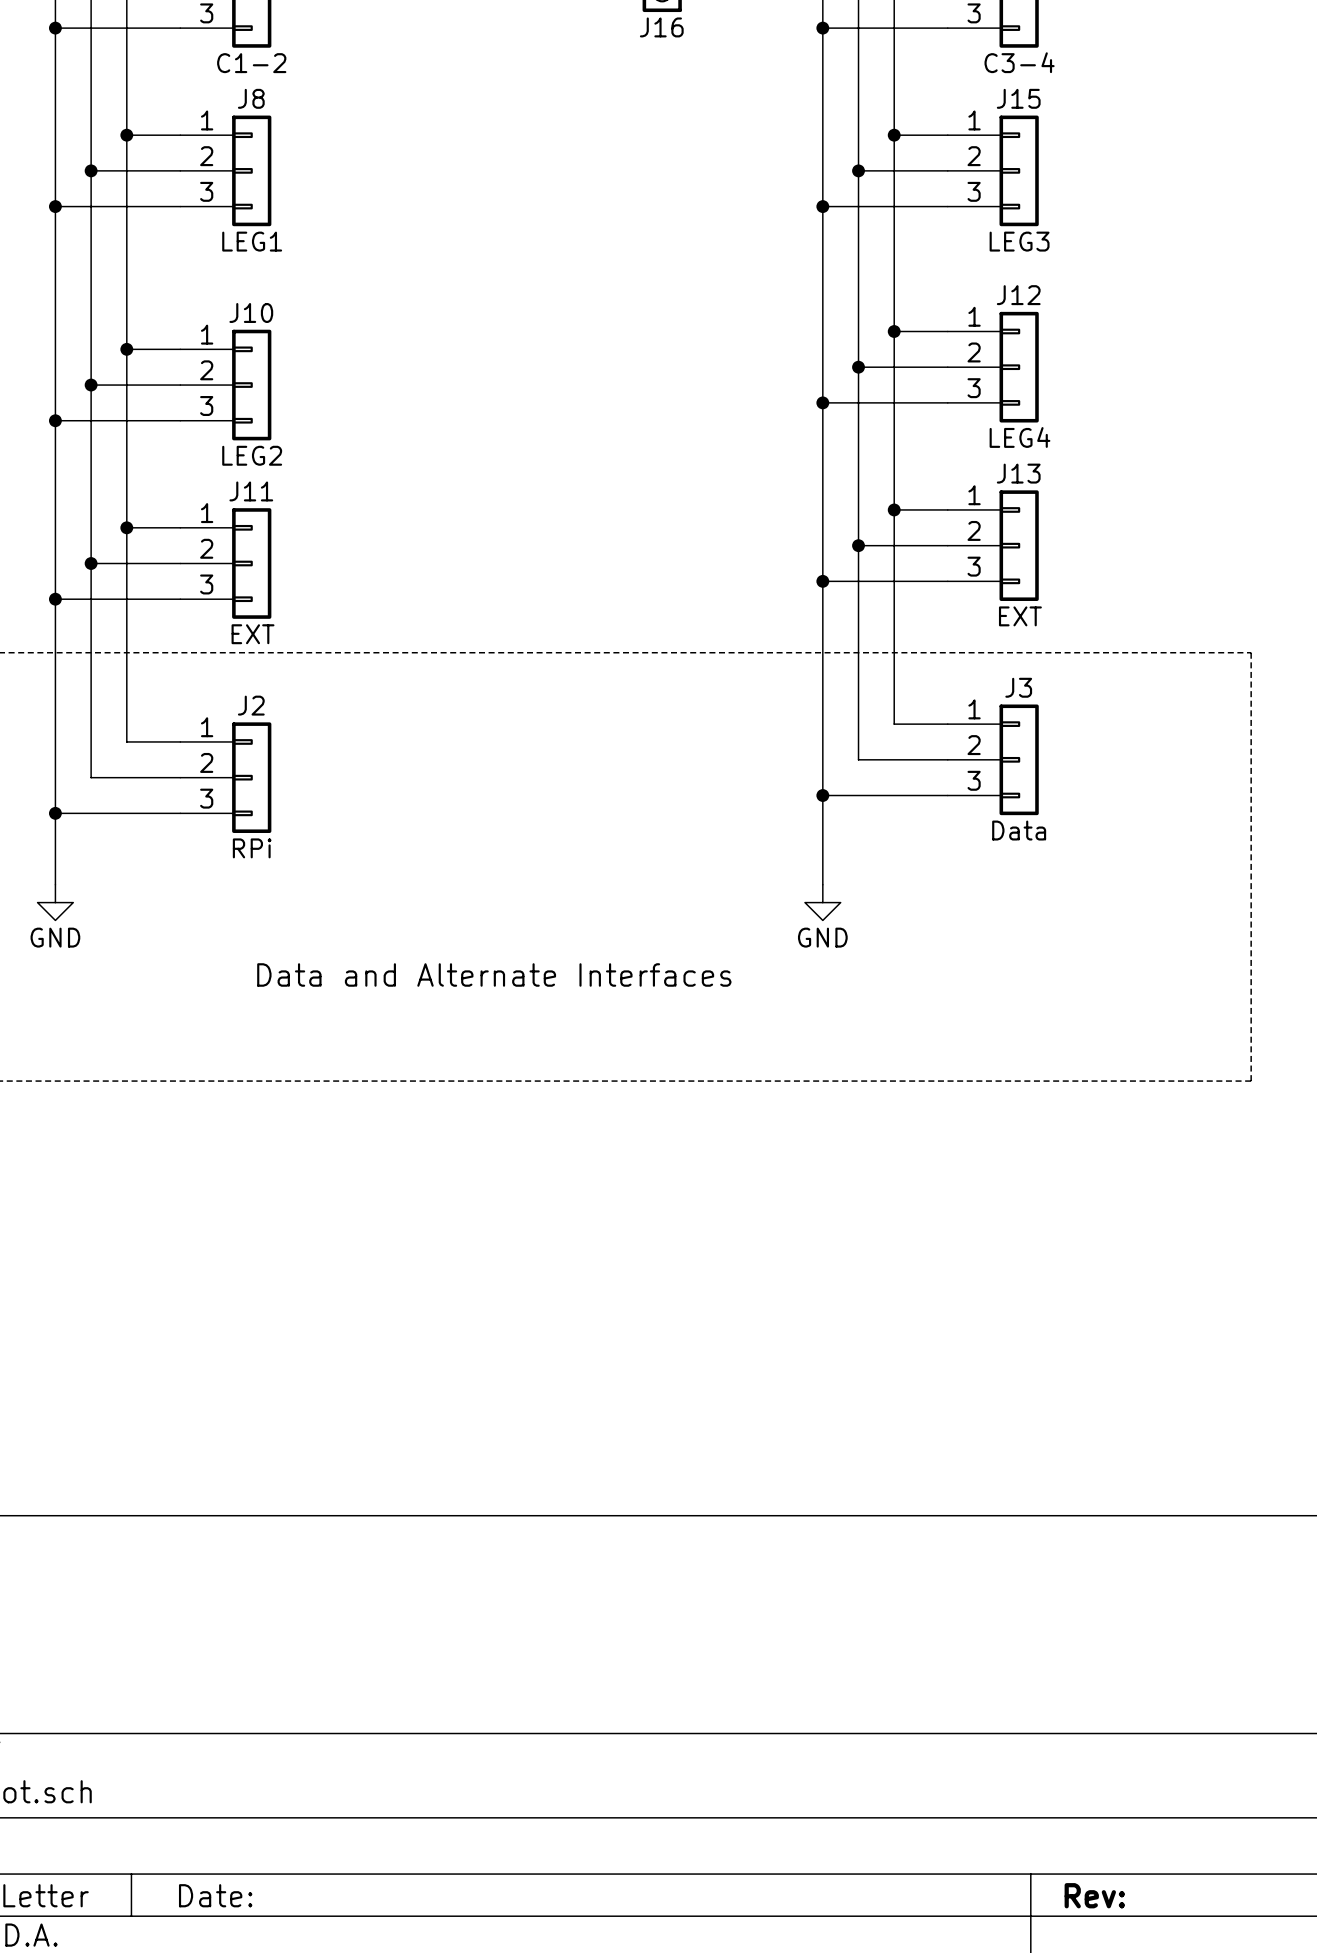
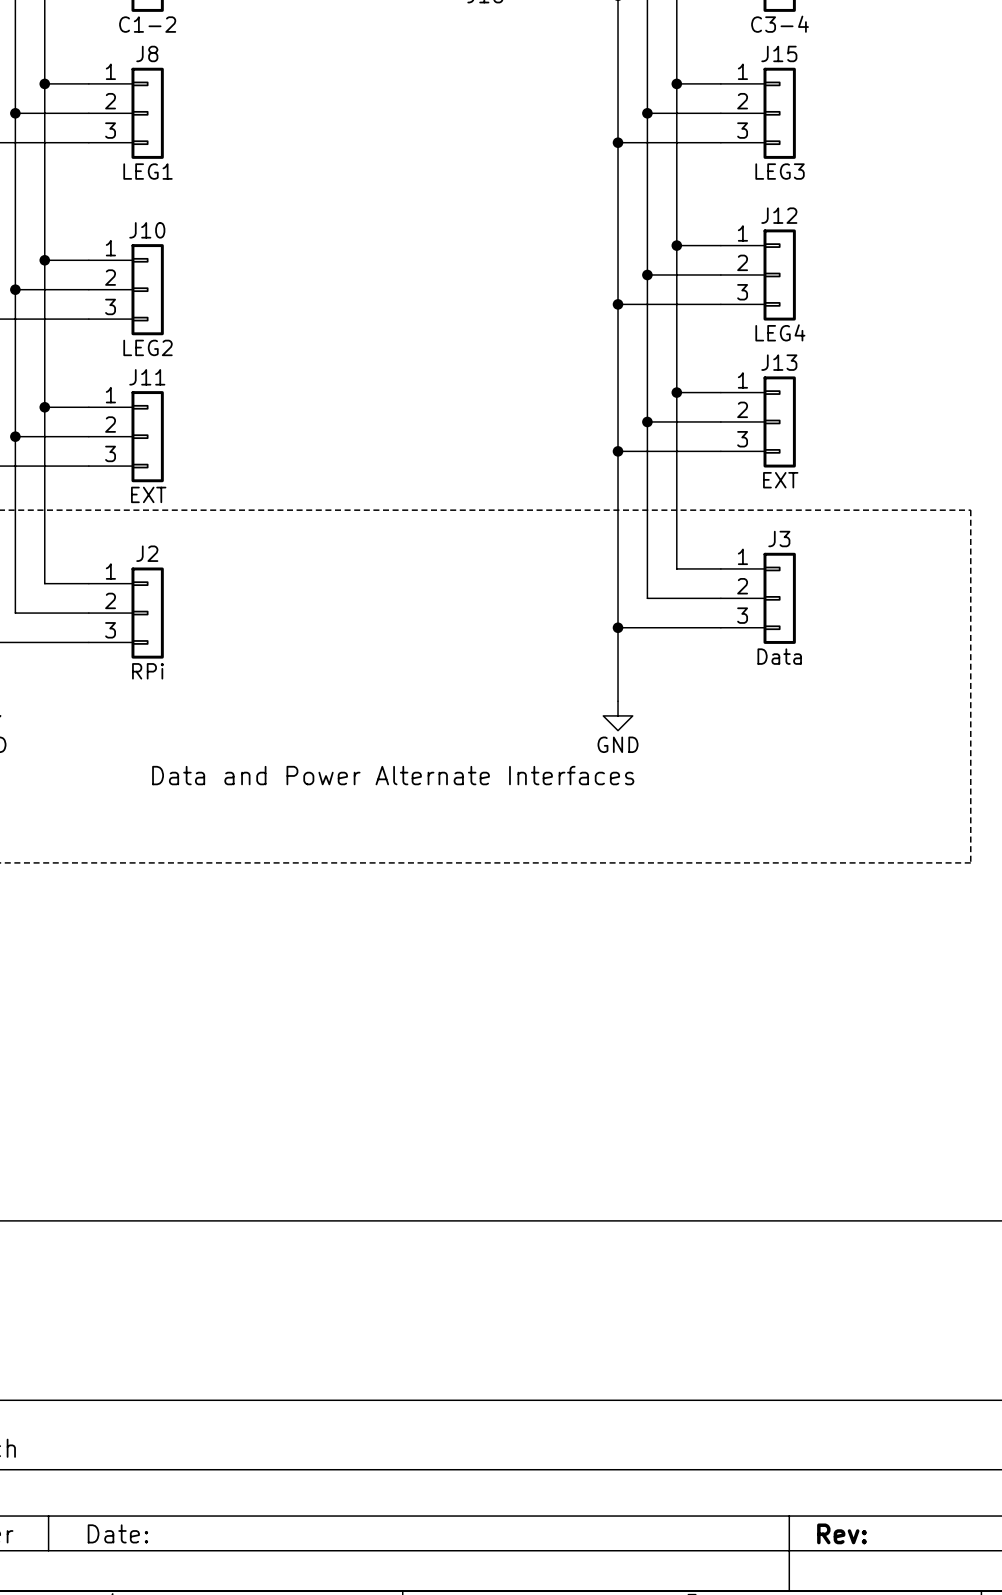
text: Data and Alternate Interfaces (494, 974) -> Data and Power Alternate Interfaces (393, 775)

